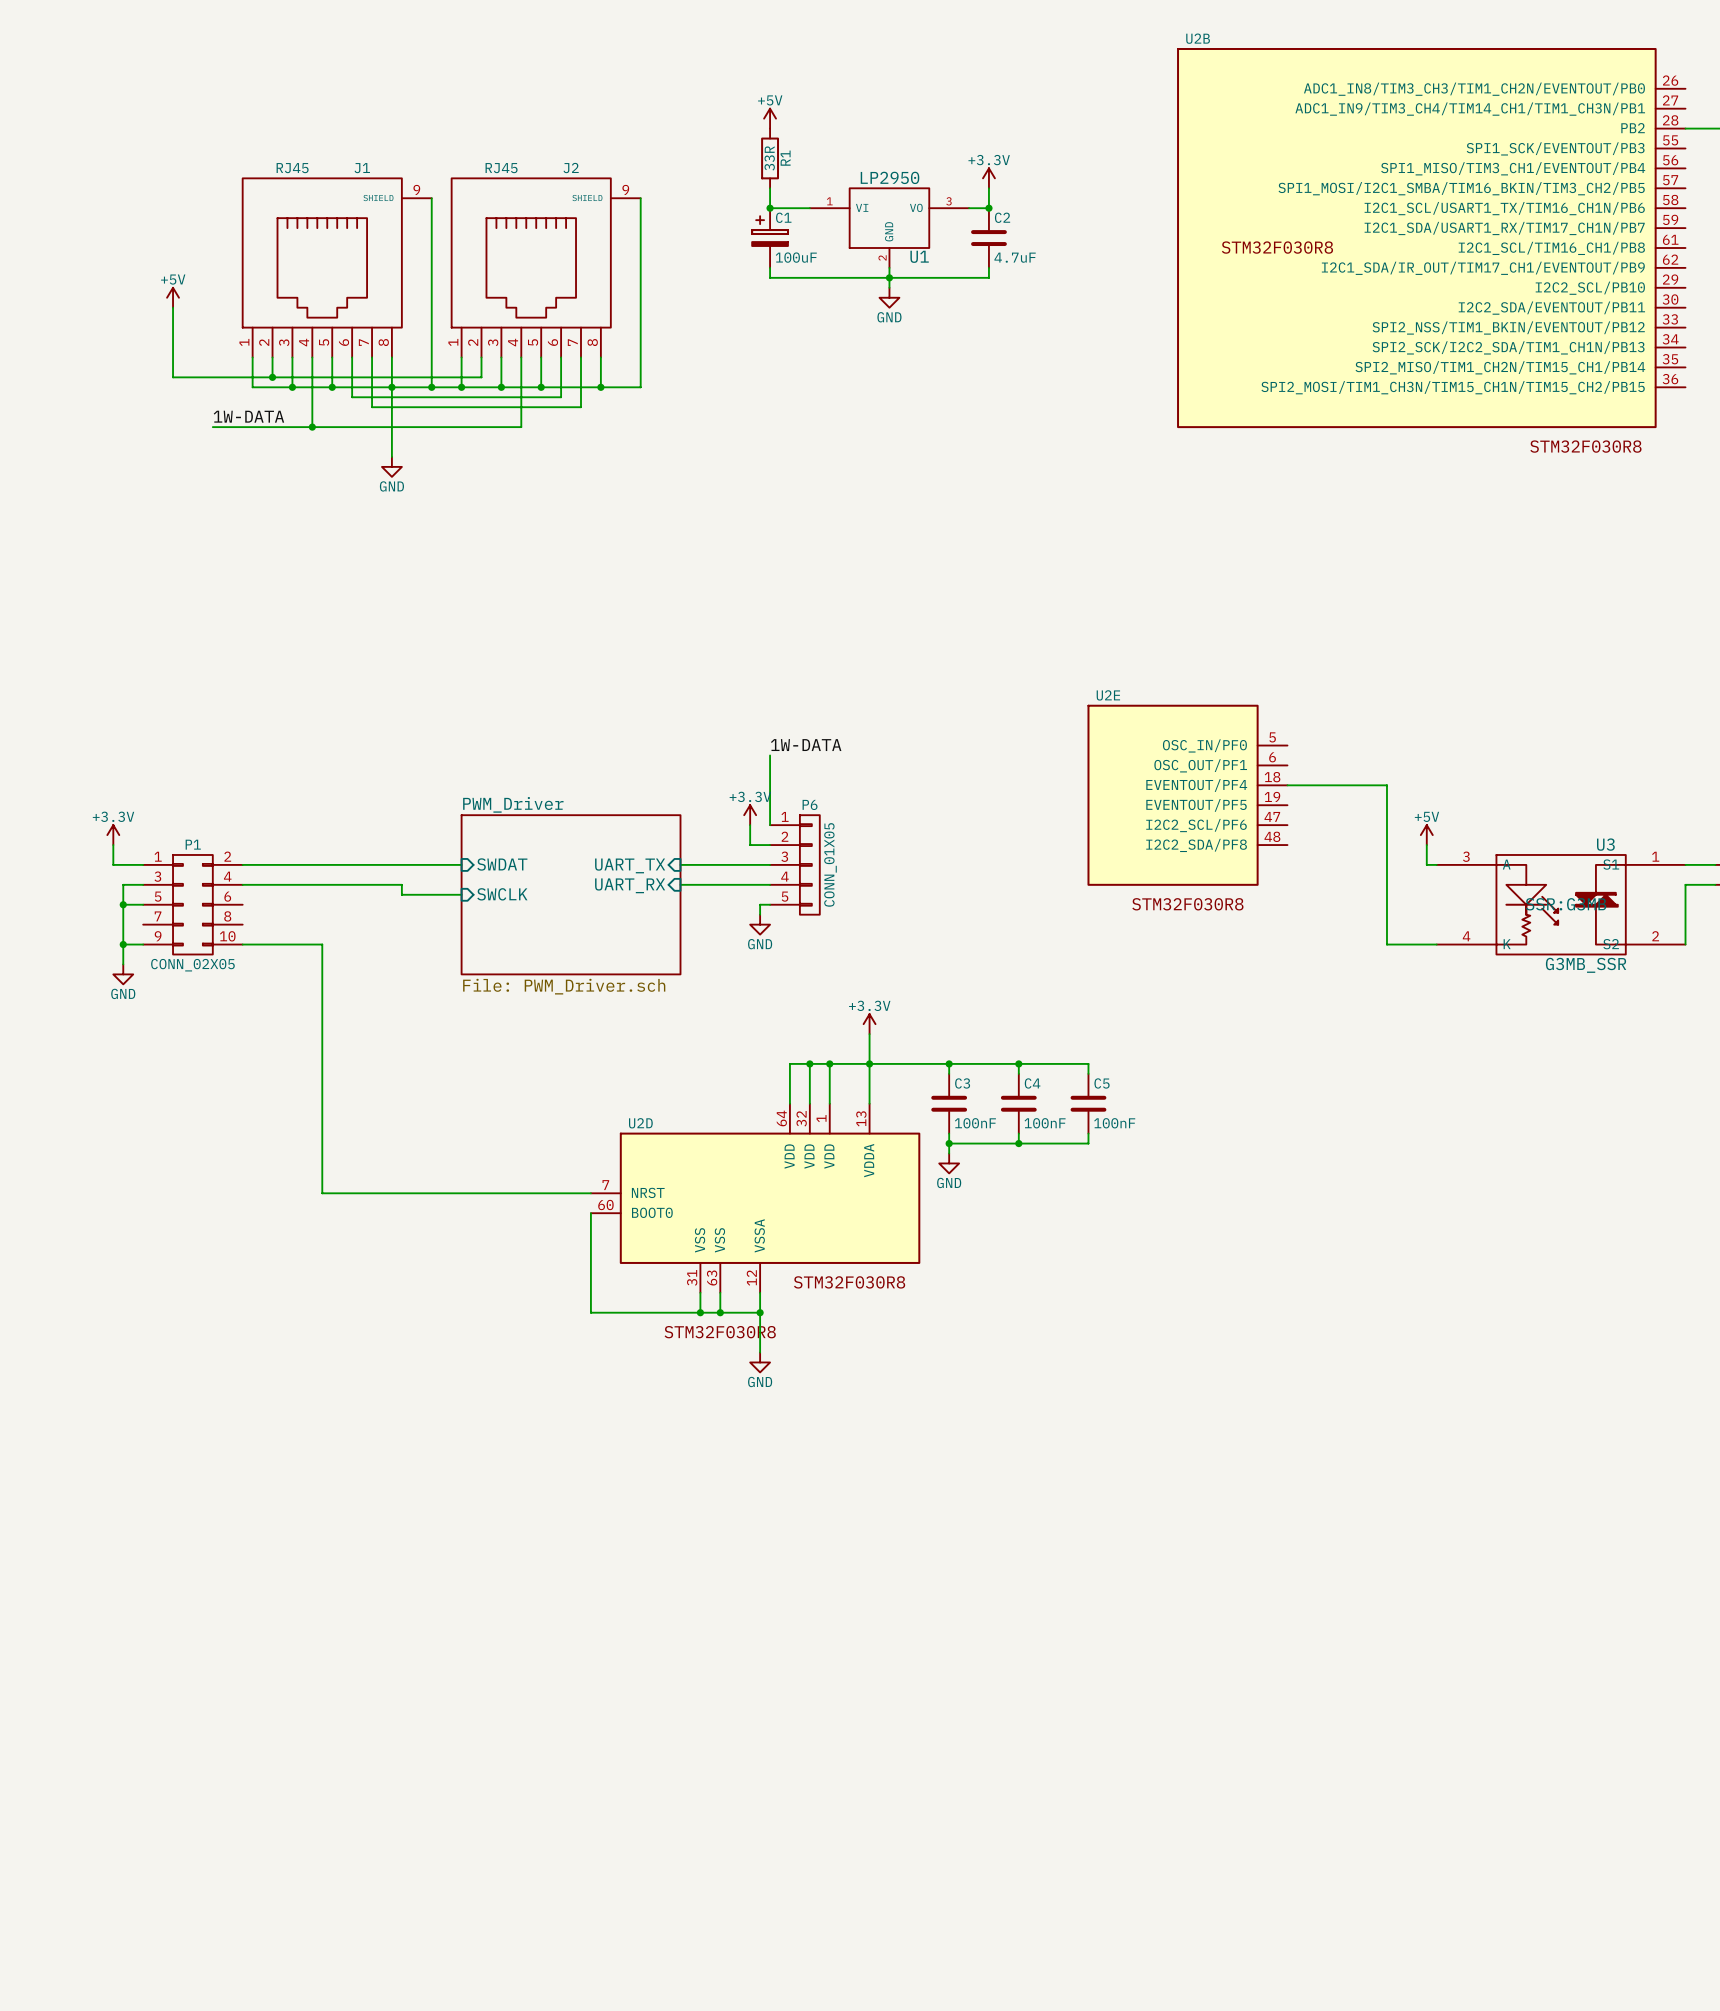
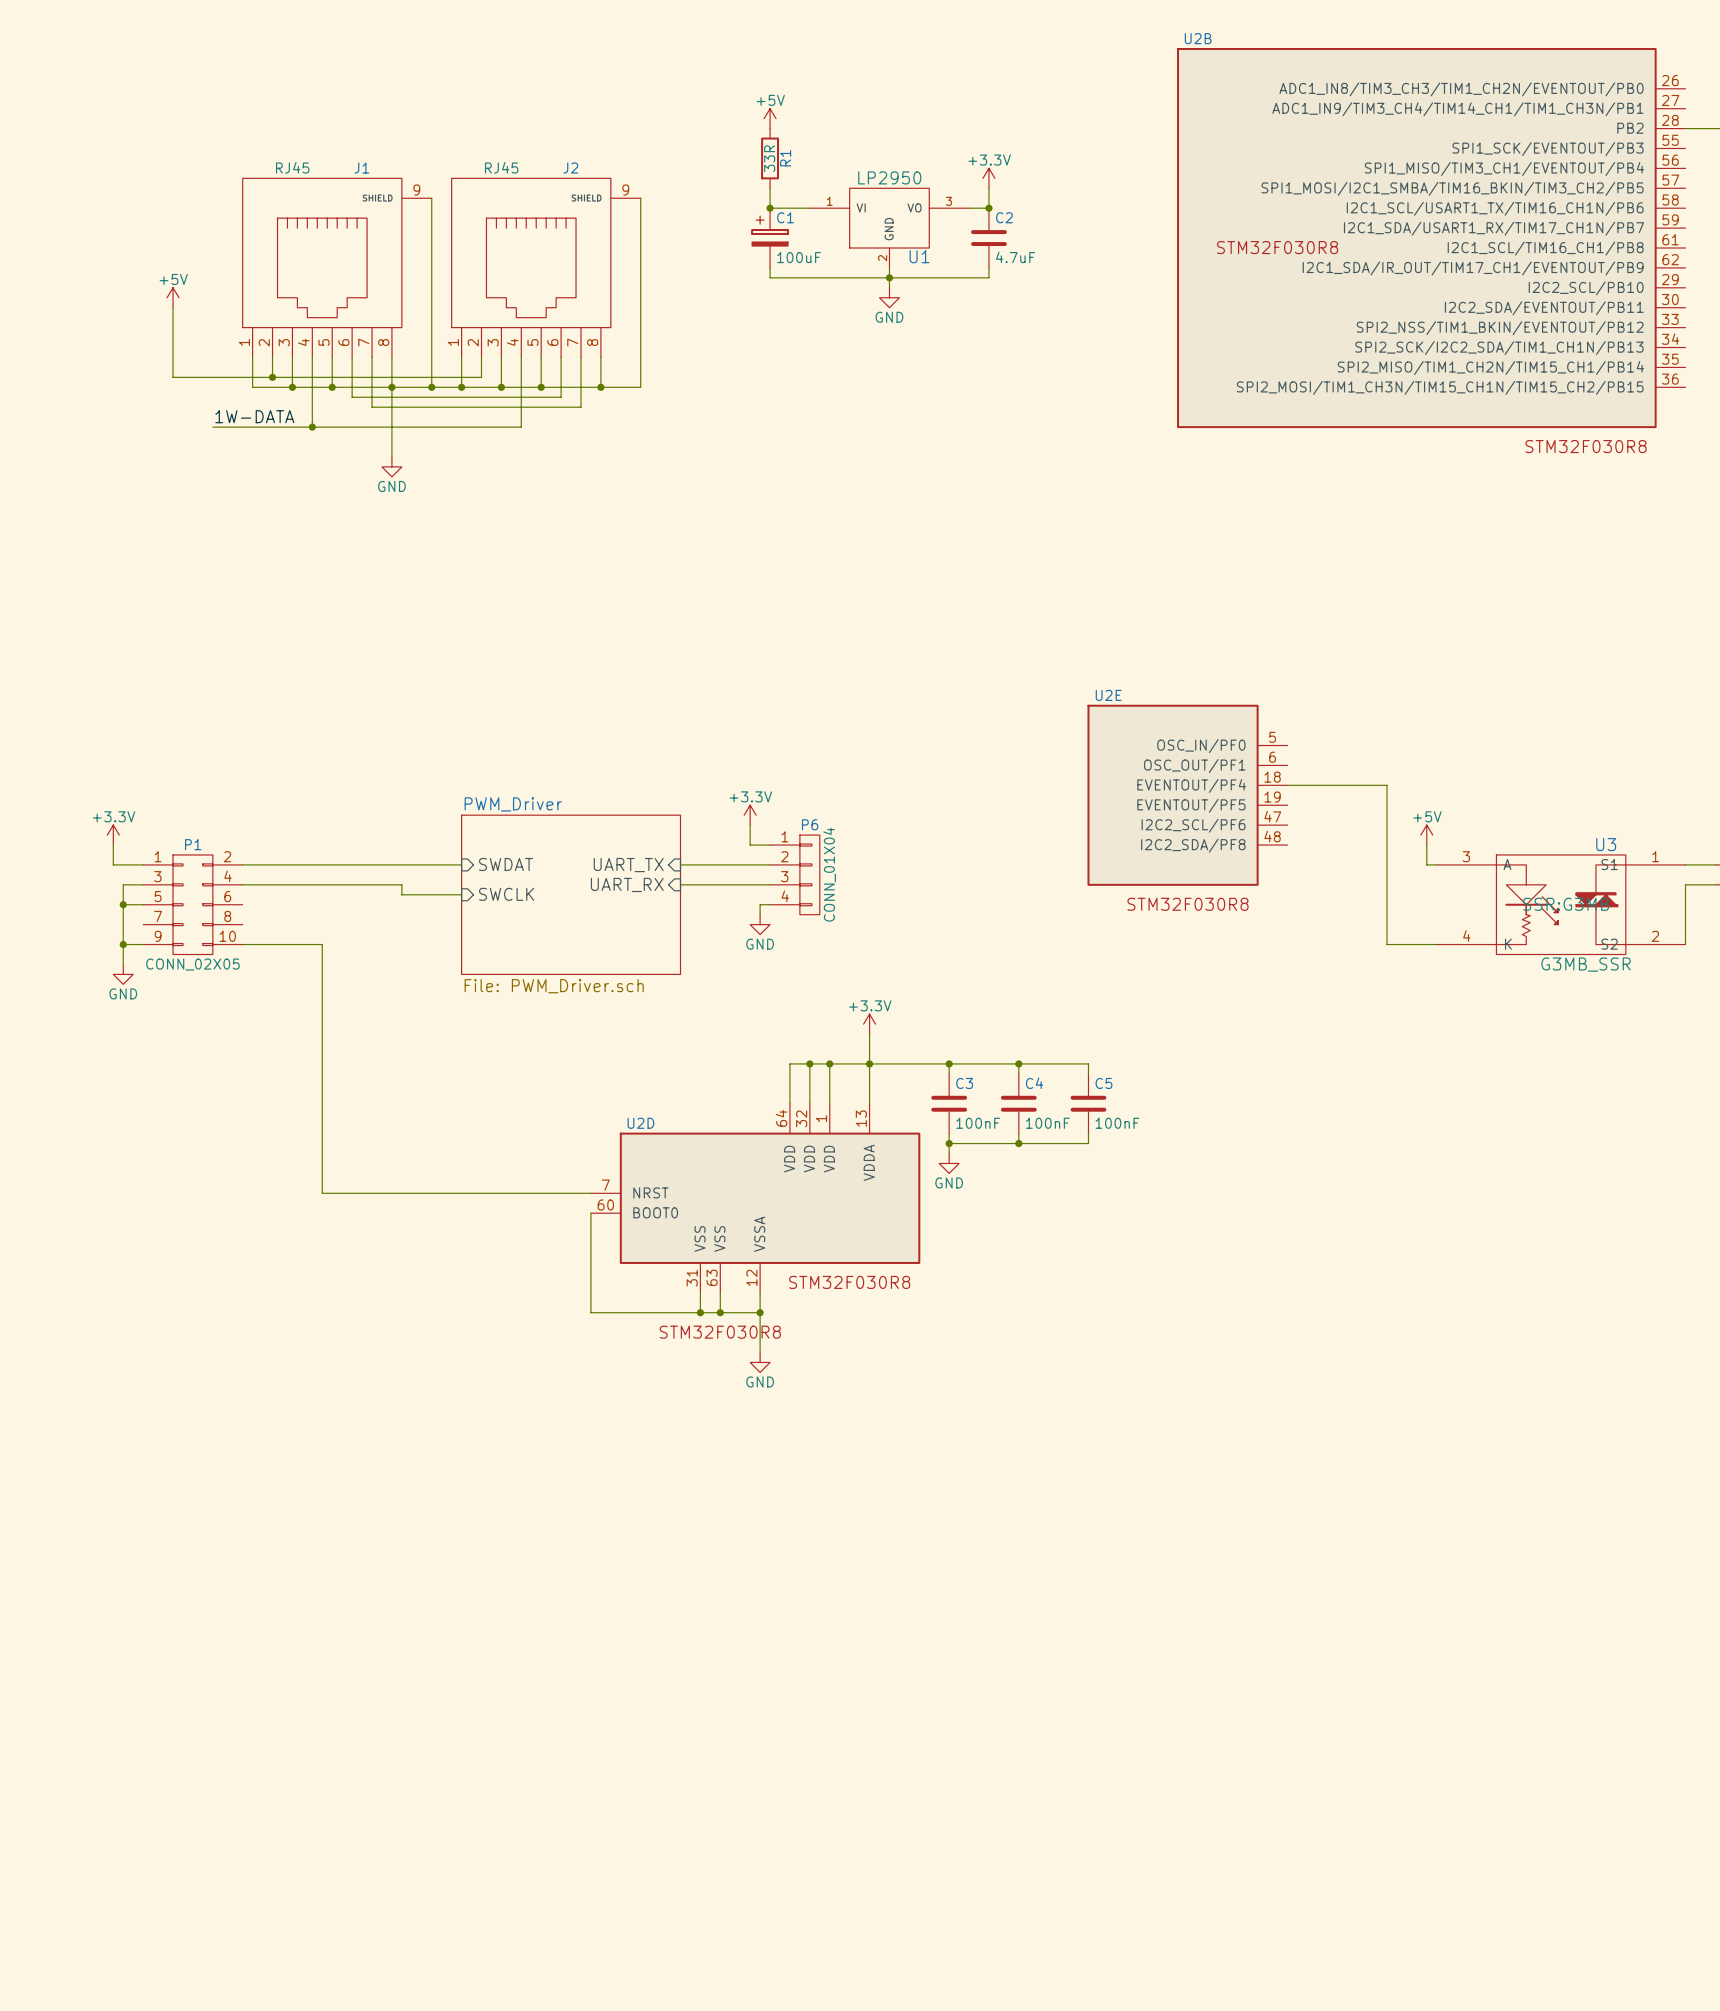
label: 1W-DATA (806, 745) -> none
wire: (770, 755) (770, 825) -> none
P6 symbol: [770, 815, 820, 915] -> [770, 835, 820, 915]
P6 value: CONN_01X05 (830, 864) -> CONN_01X04 (829, 874)

